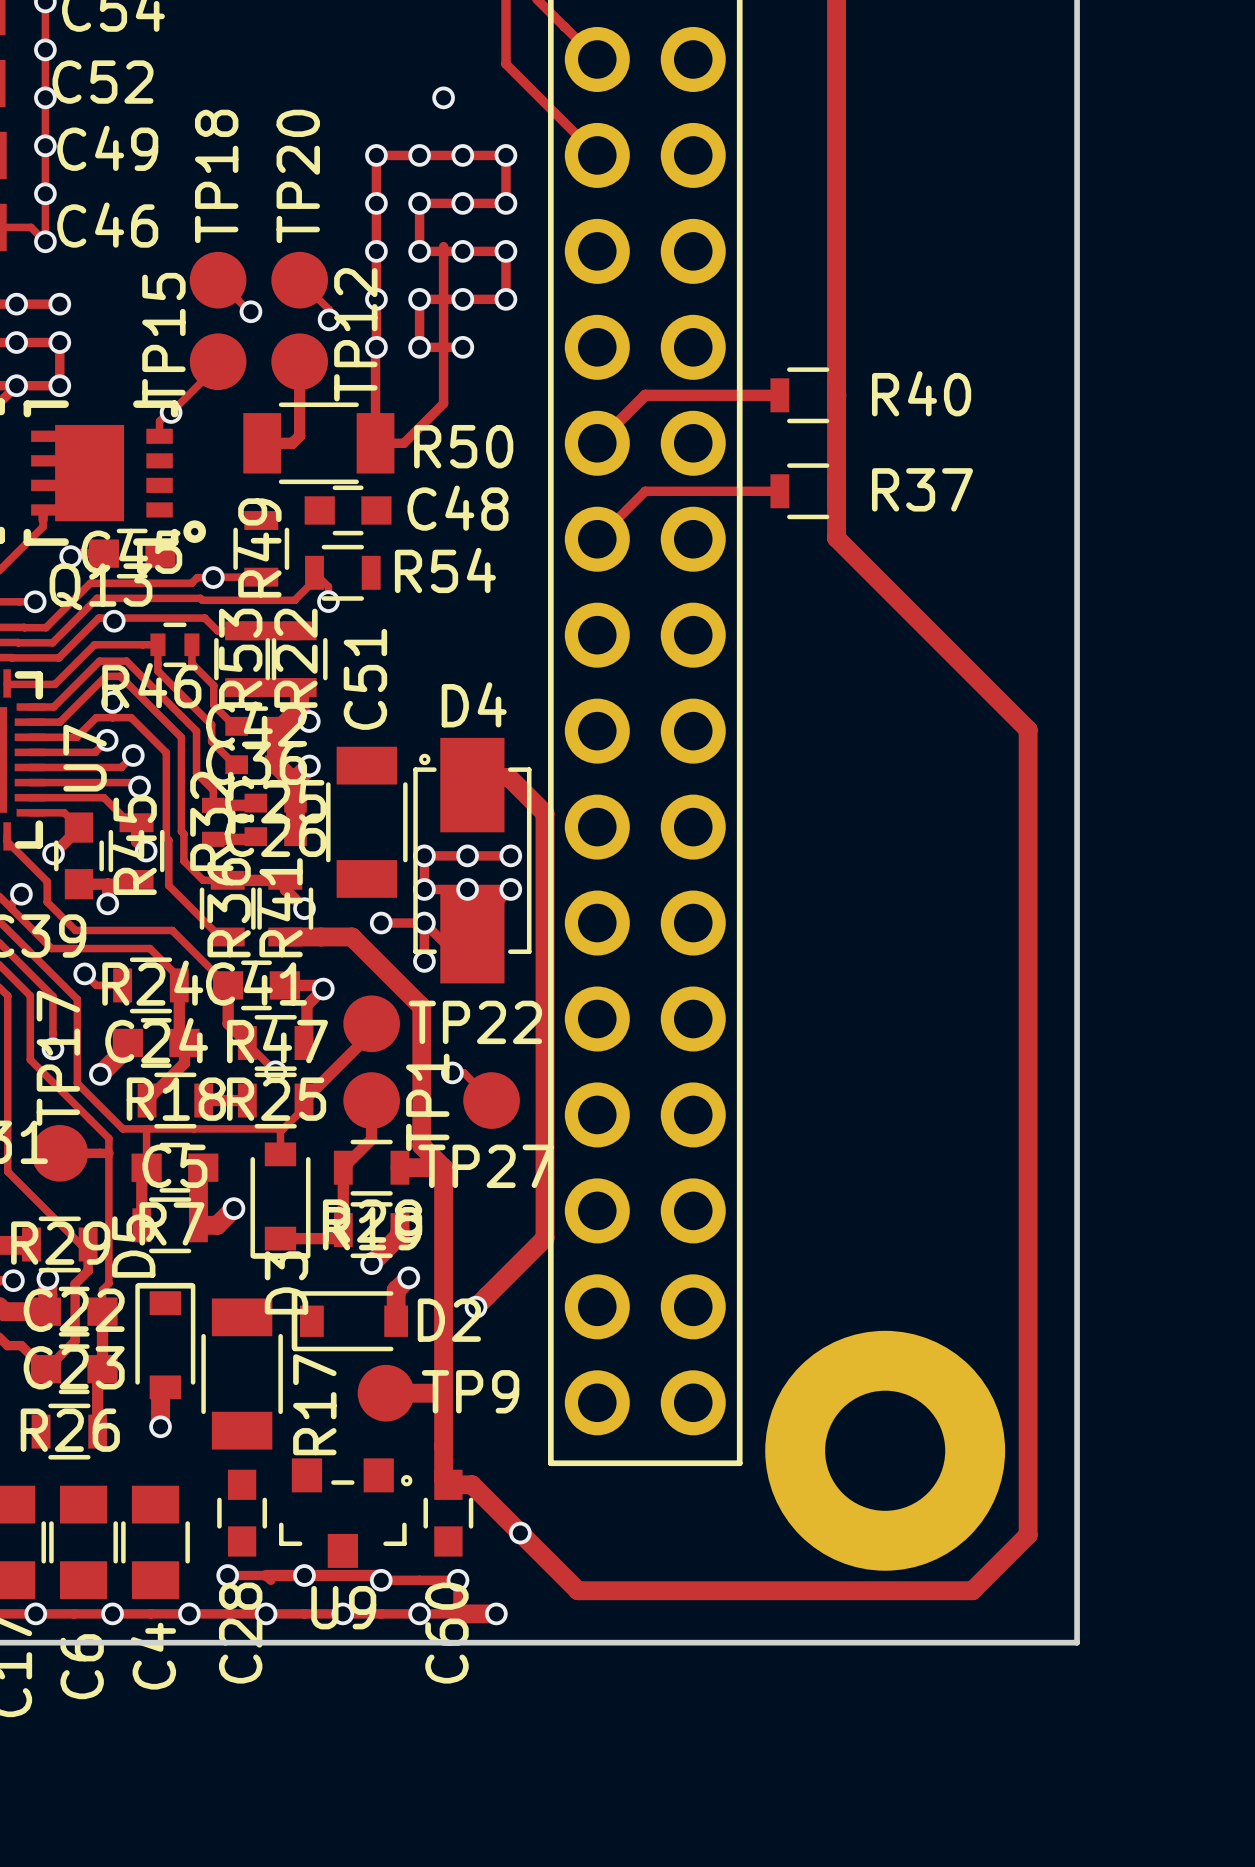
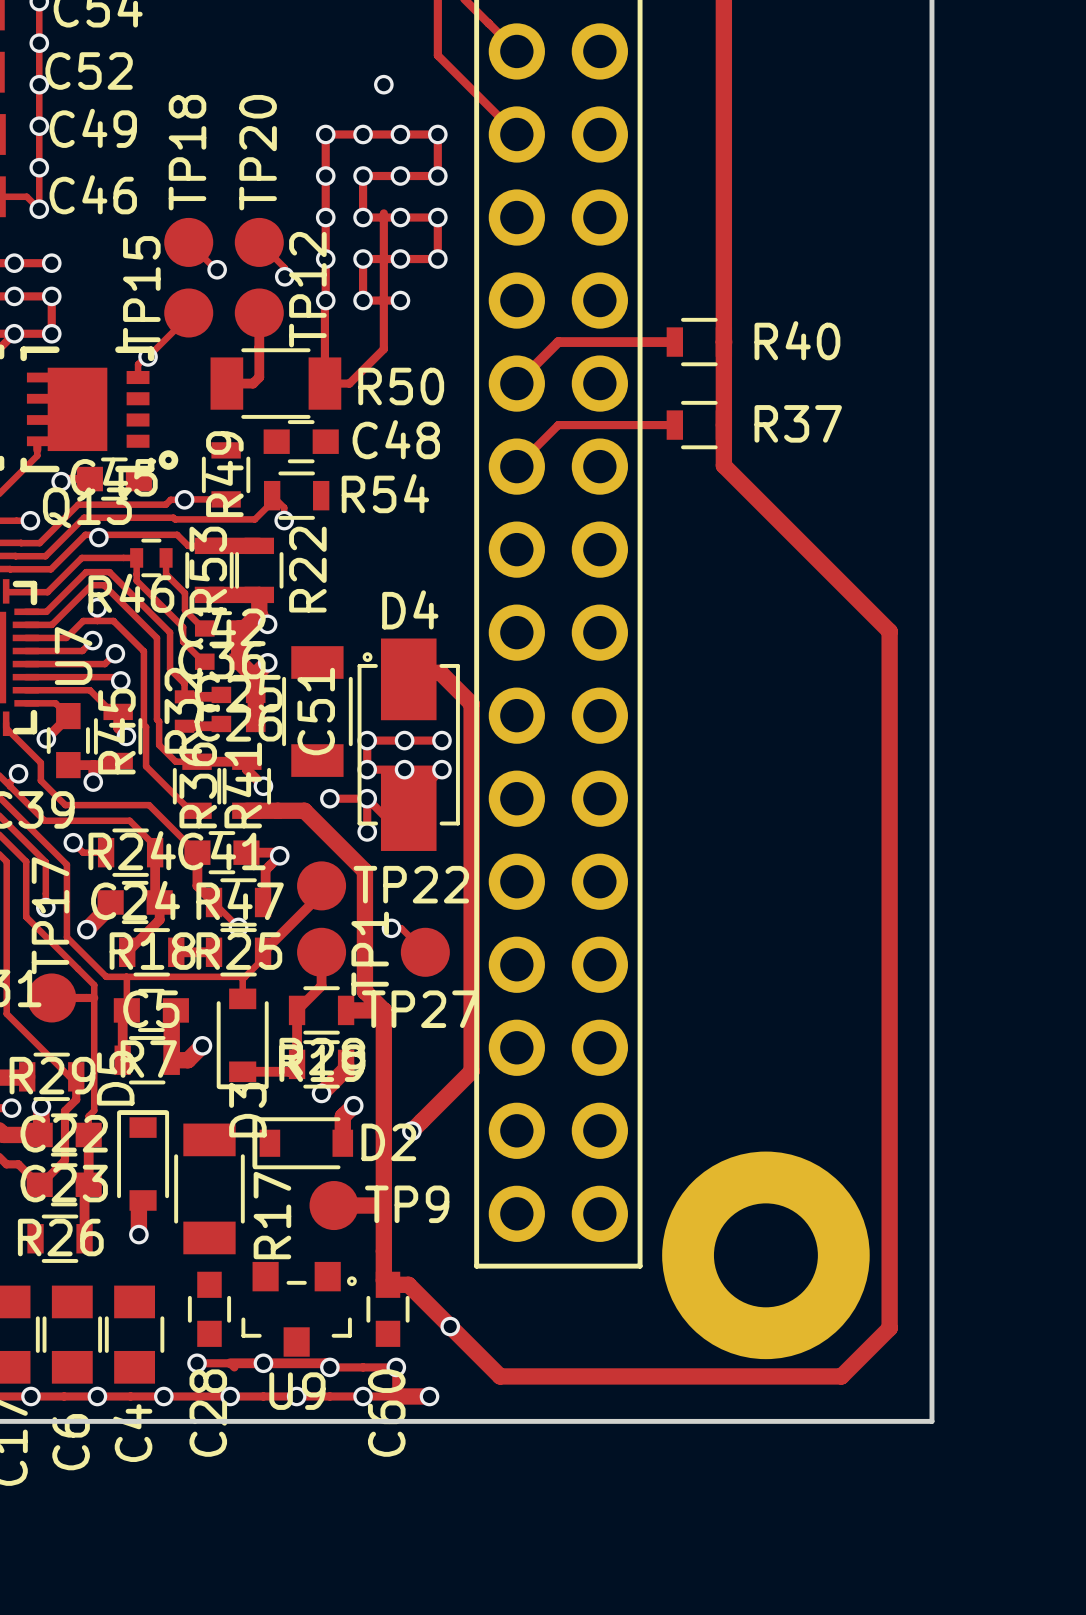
R22 name position: R22 (295, 658) -> R22 (307, 569)
C51 name position: C51 (365, 679) -> C51 (316, 711)

